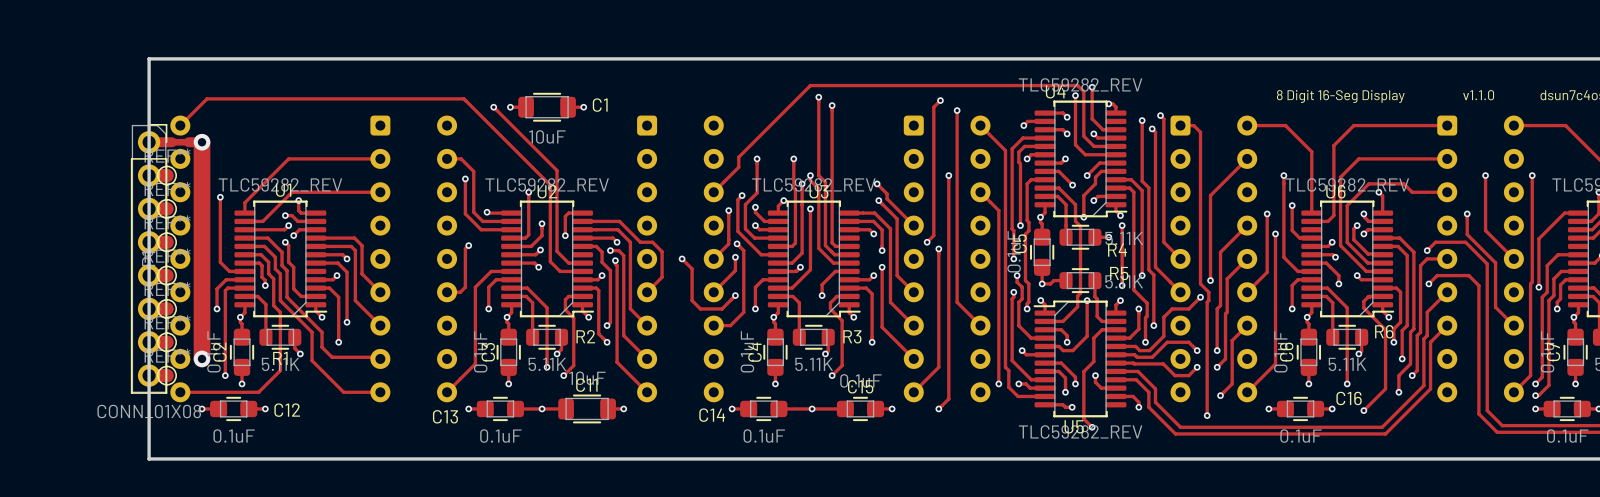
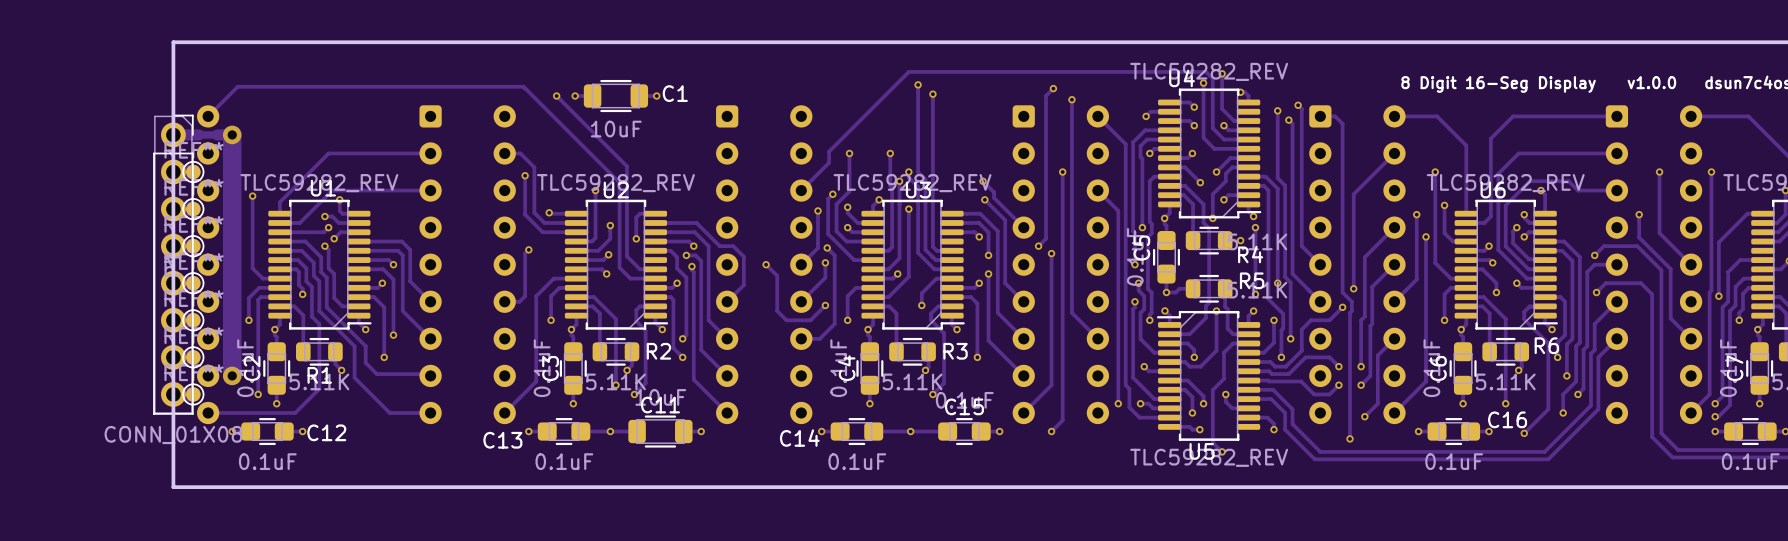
text: v1.1.0 (1478, 95) -> v1.0.0 (1651, 82)

